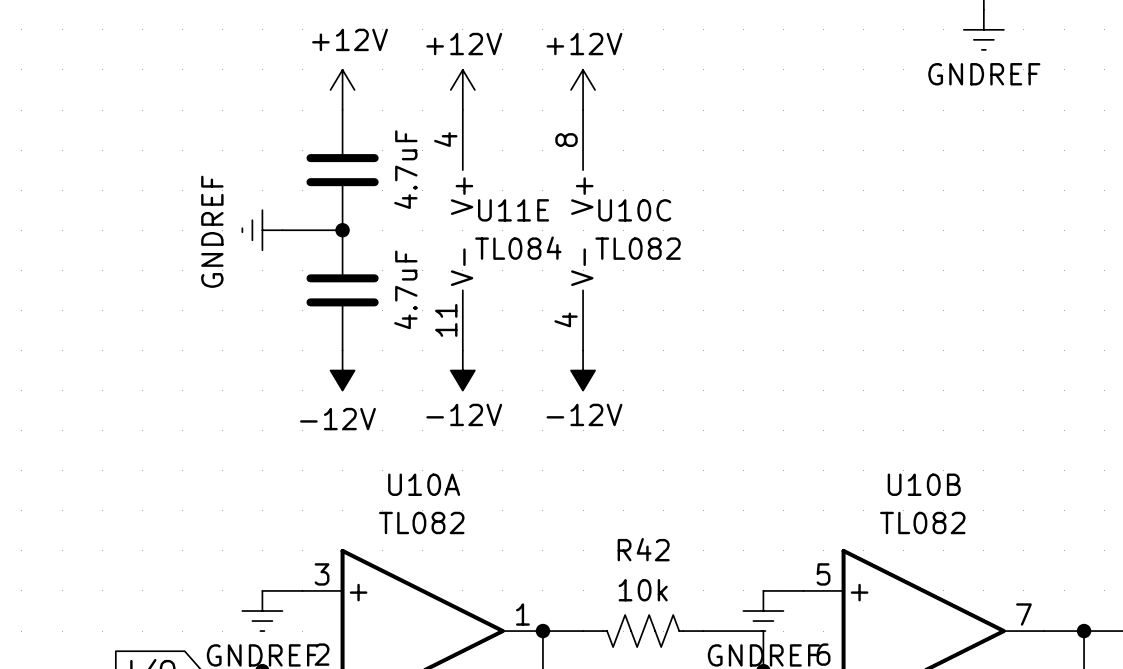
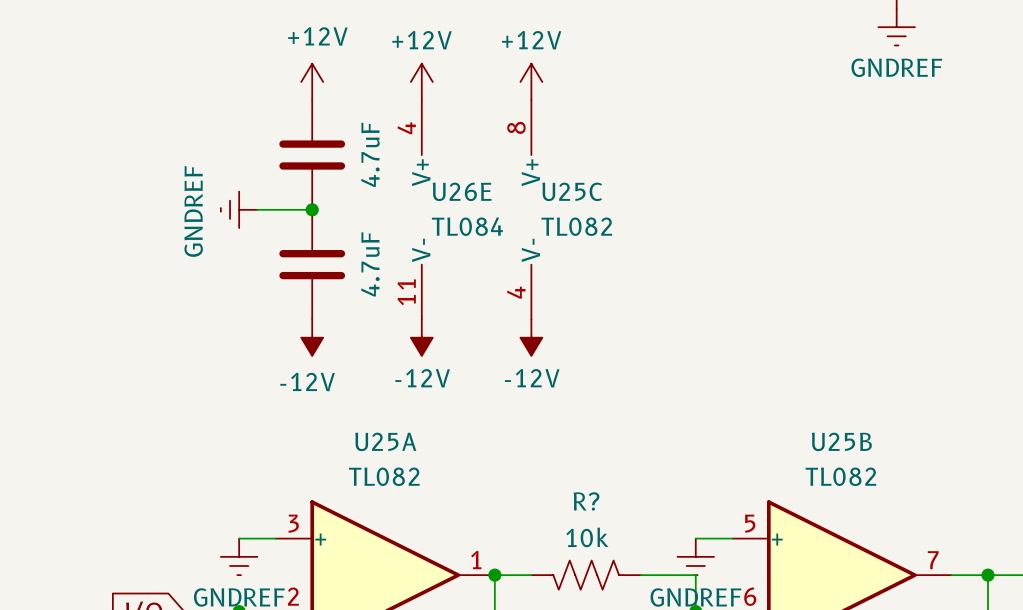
U11E name: U11E (513, 210) -> U26E (462, 191)
U10C name: U10C (634, 210) -> U25C (572, 191)
U10A name: U10A (424, 484) -> U25A (385, 441)
U10B name: U10B (924, 484) -> U25B (841, 441)
R42 name: R42 (643, 549) -> R? (586, 501)

